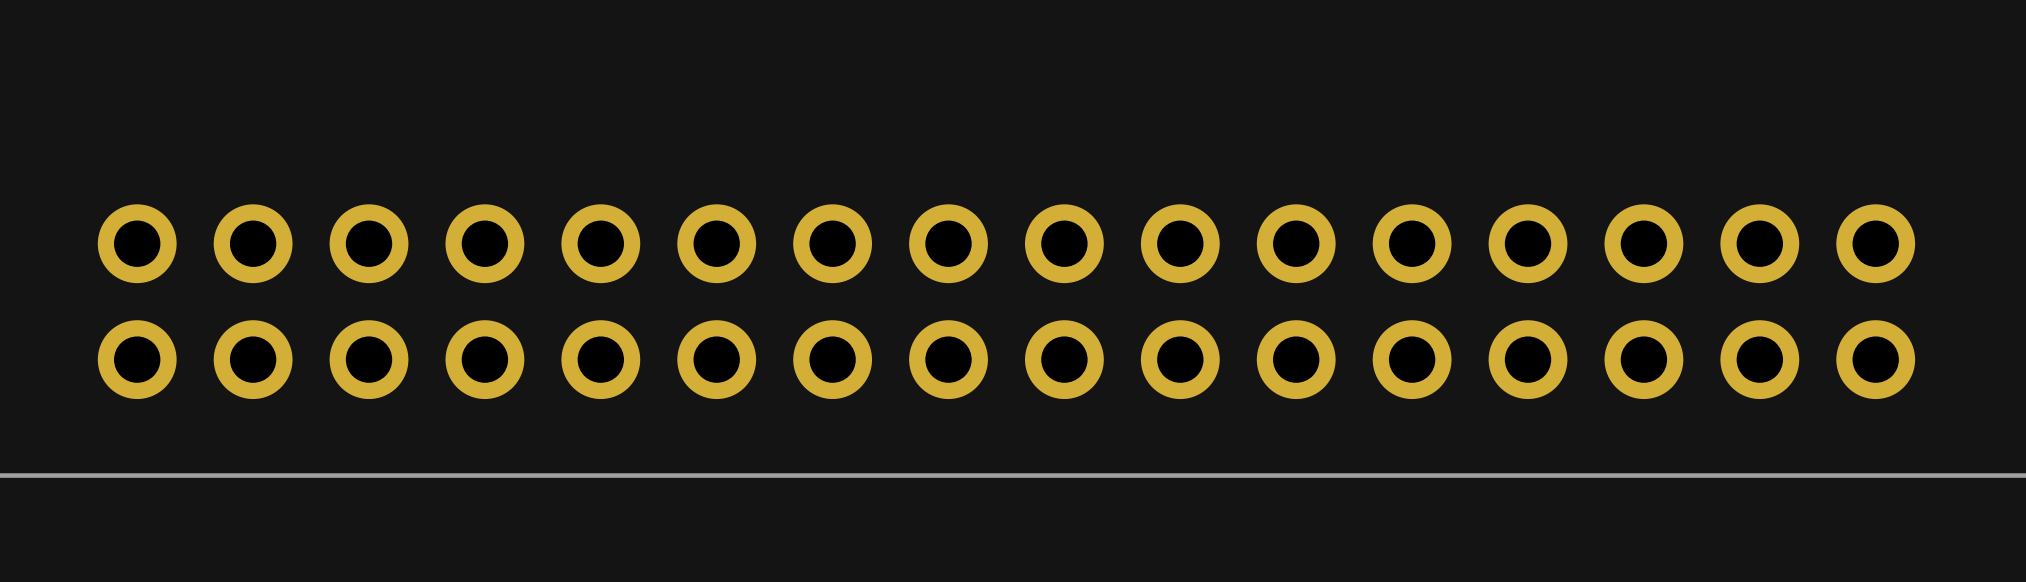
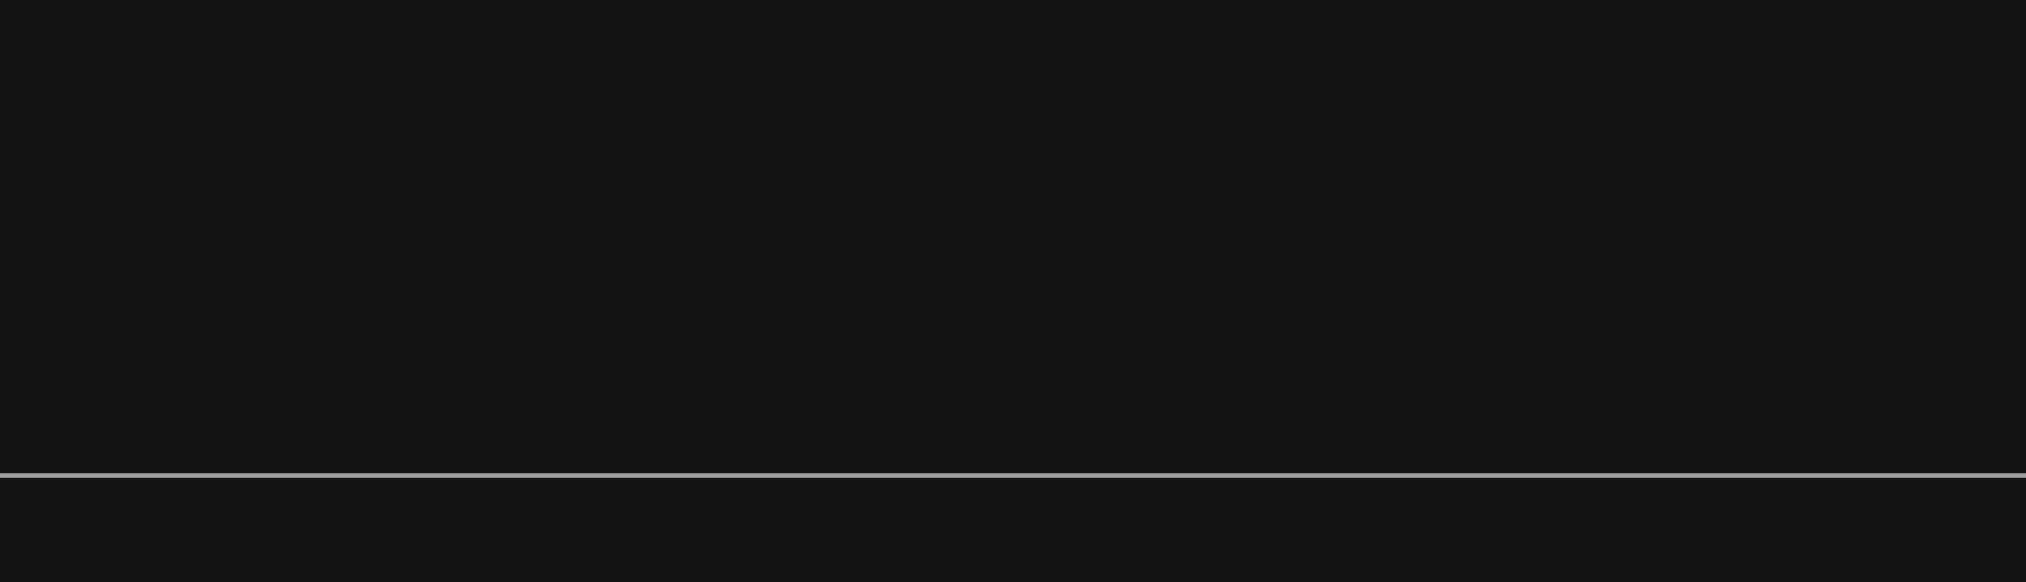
part: (1006, 301) -> none

